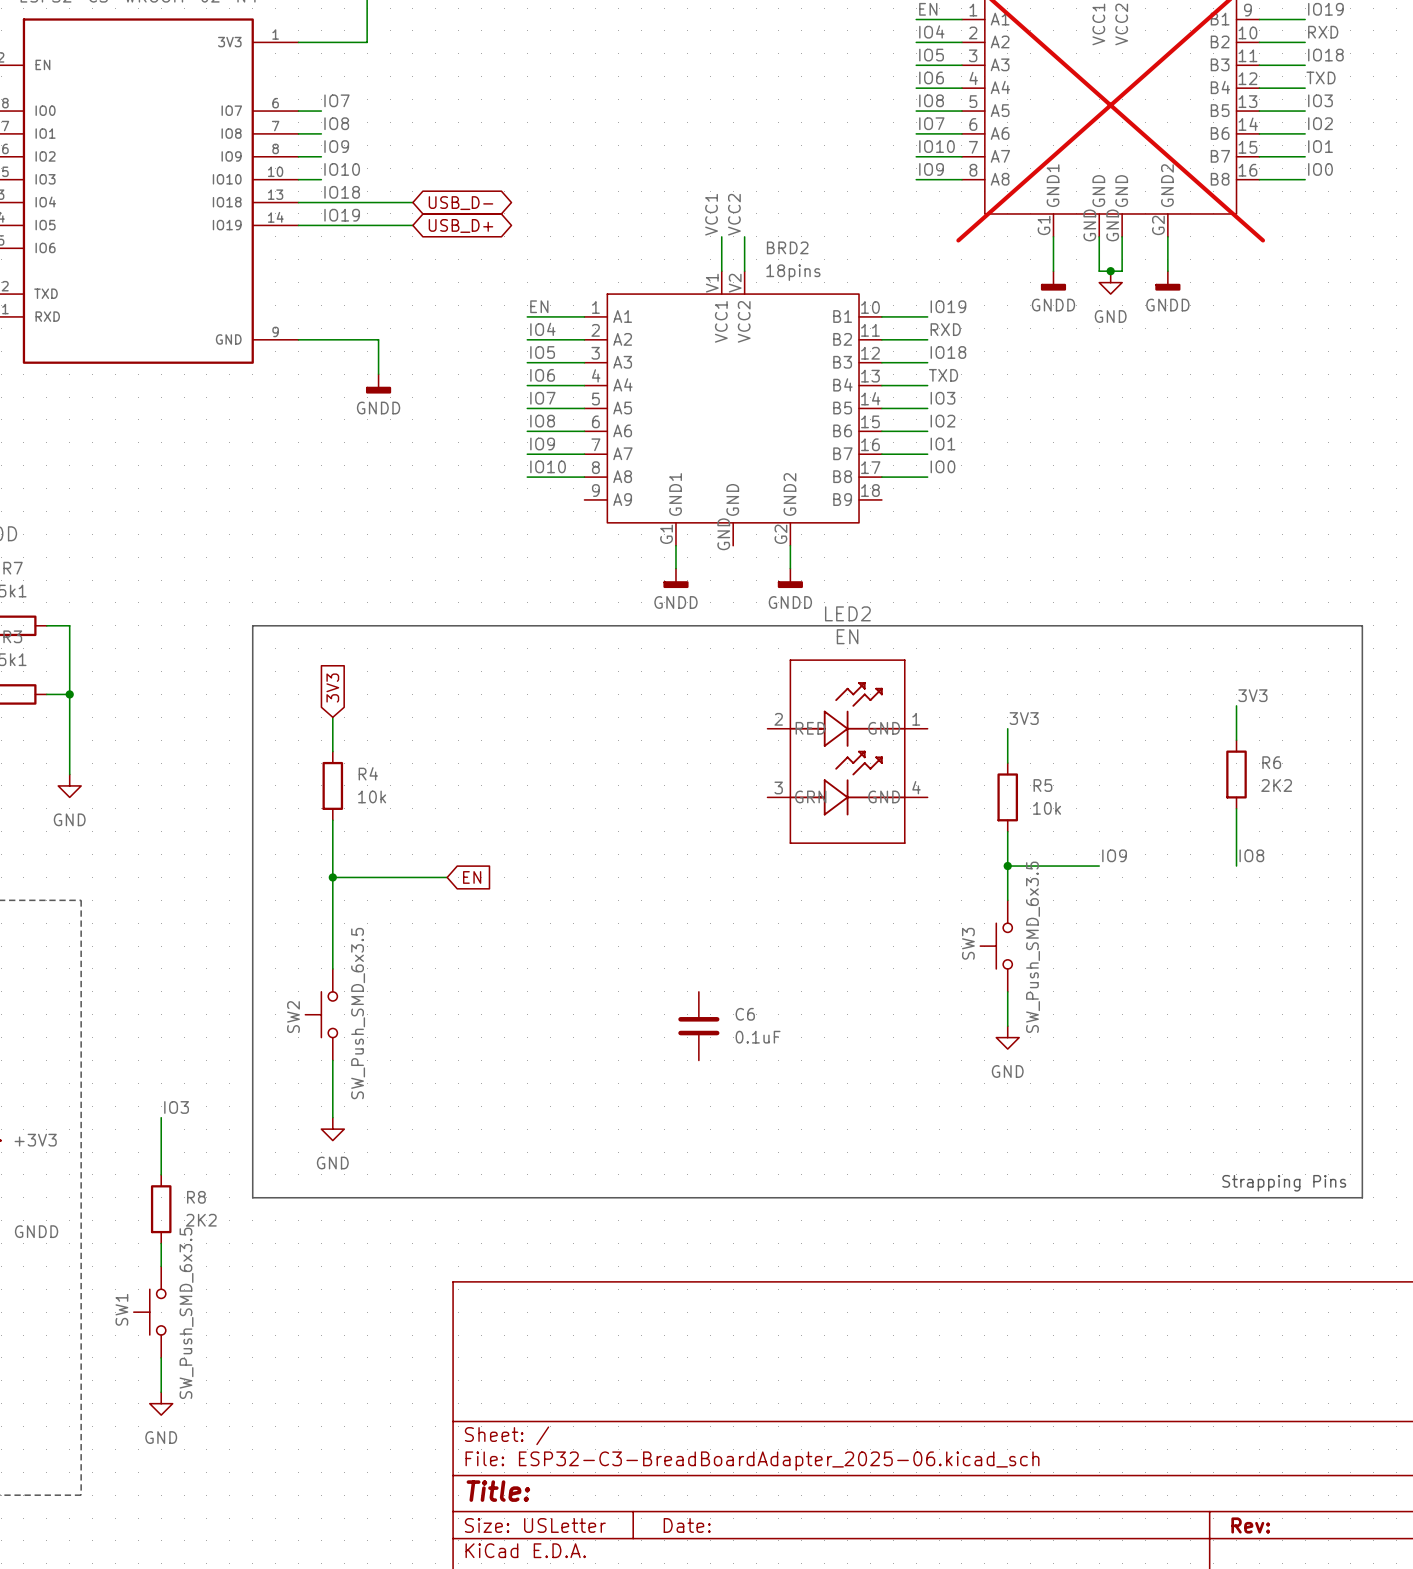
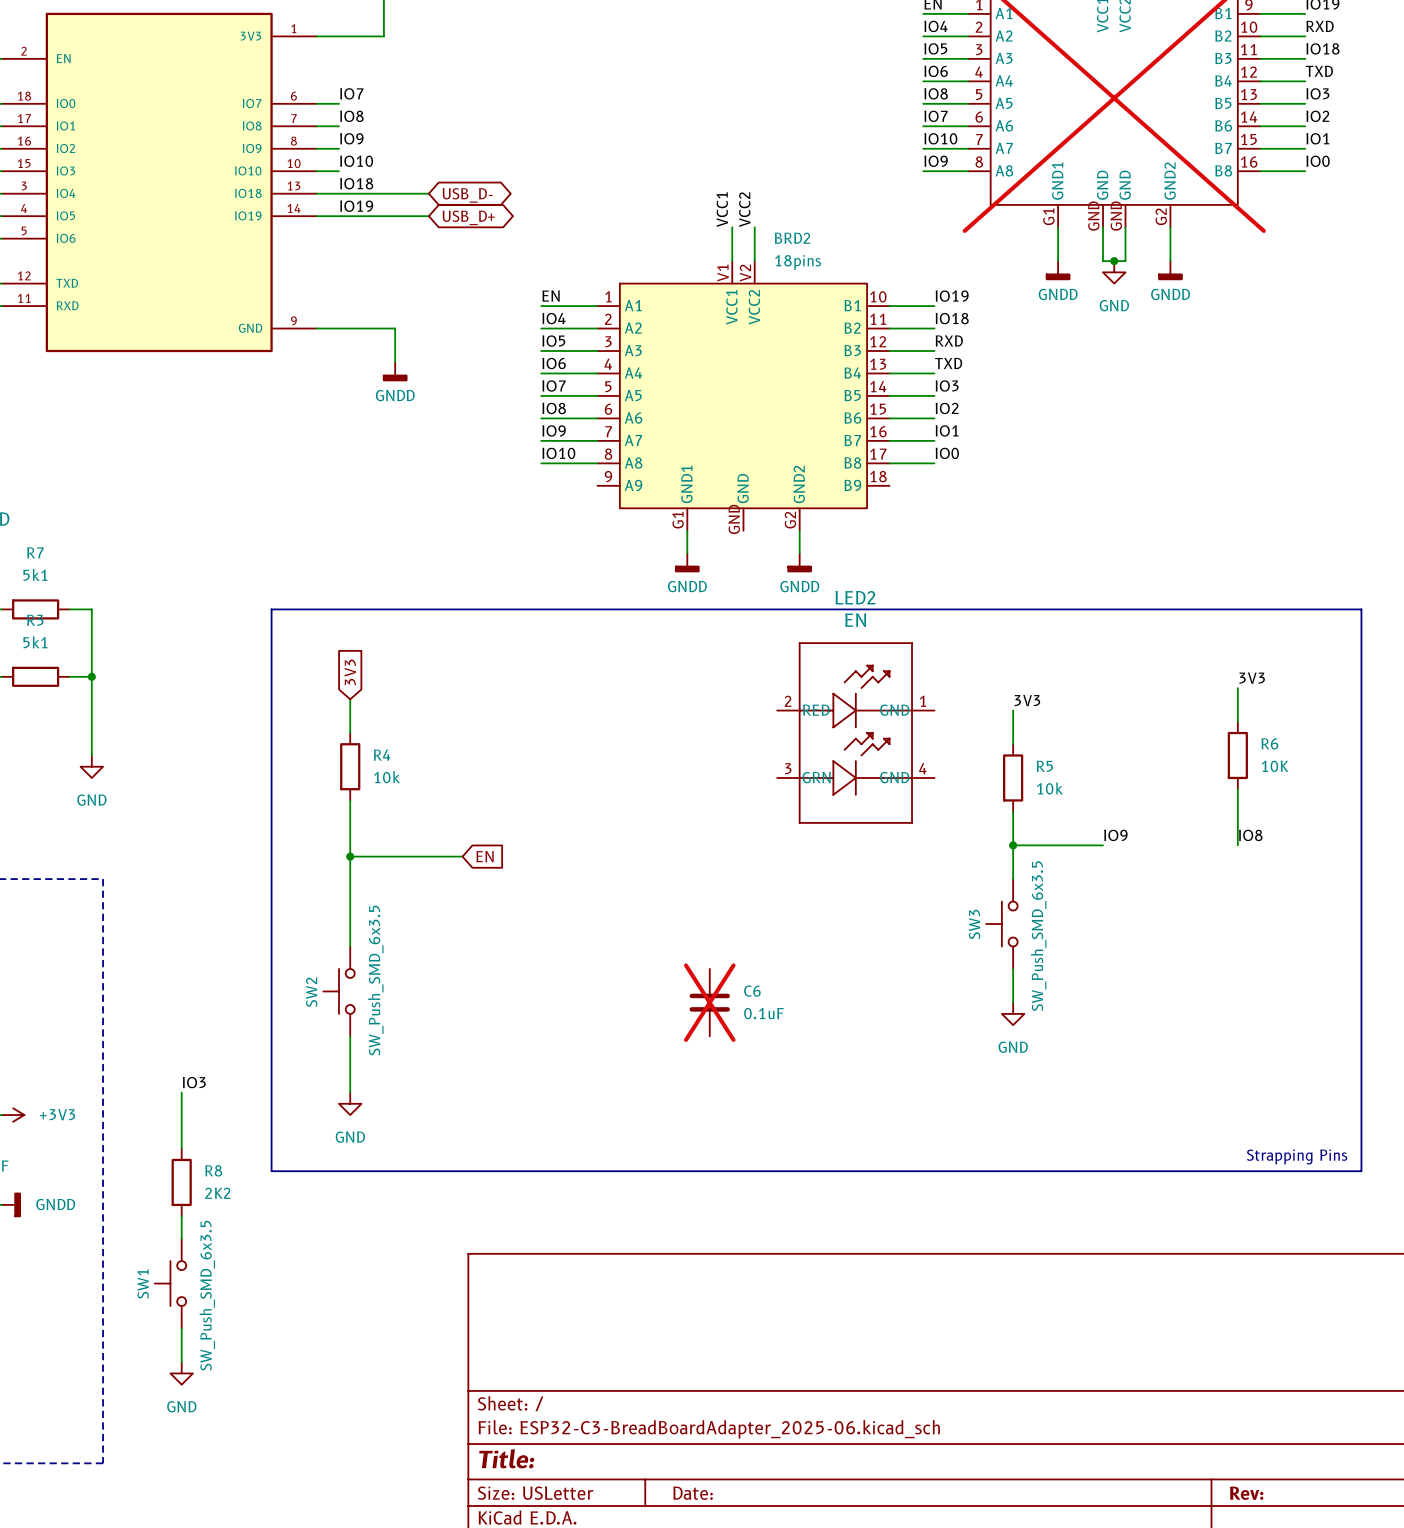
label: RXD (945, 329) -> IO18 (952, 318)
label: IO18 (948, 352) -> RXD (949, 340)
R6 value: 2K2 (1276, 785) -> 10K (1275, 766)
C6 do-not-place cross: none -> (709, 1002)

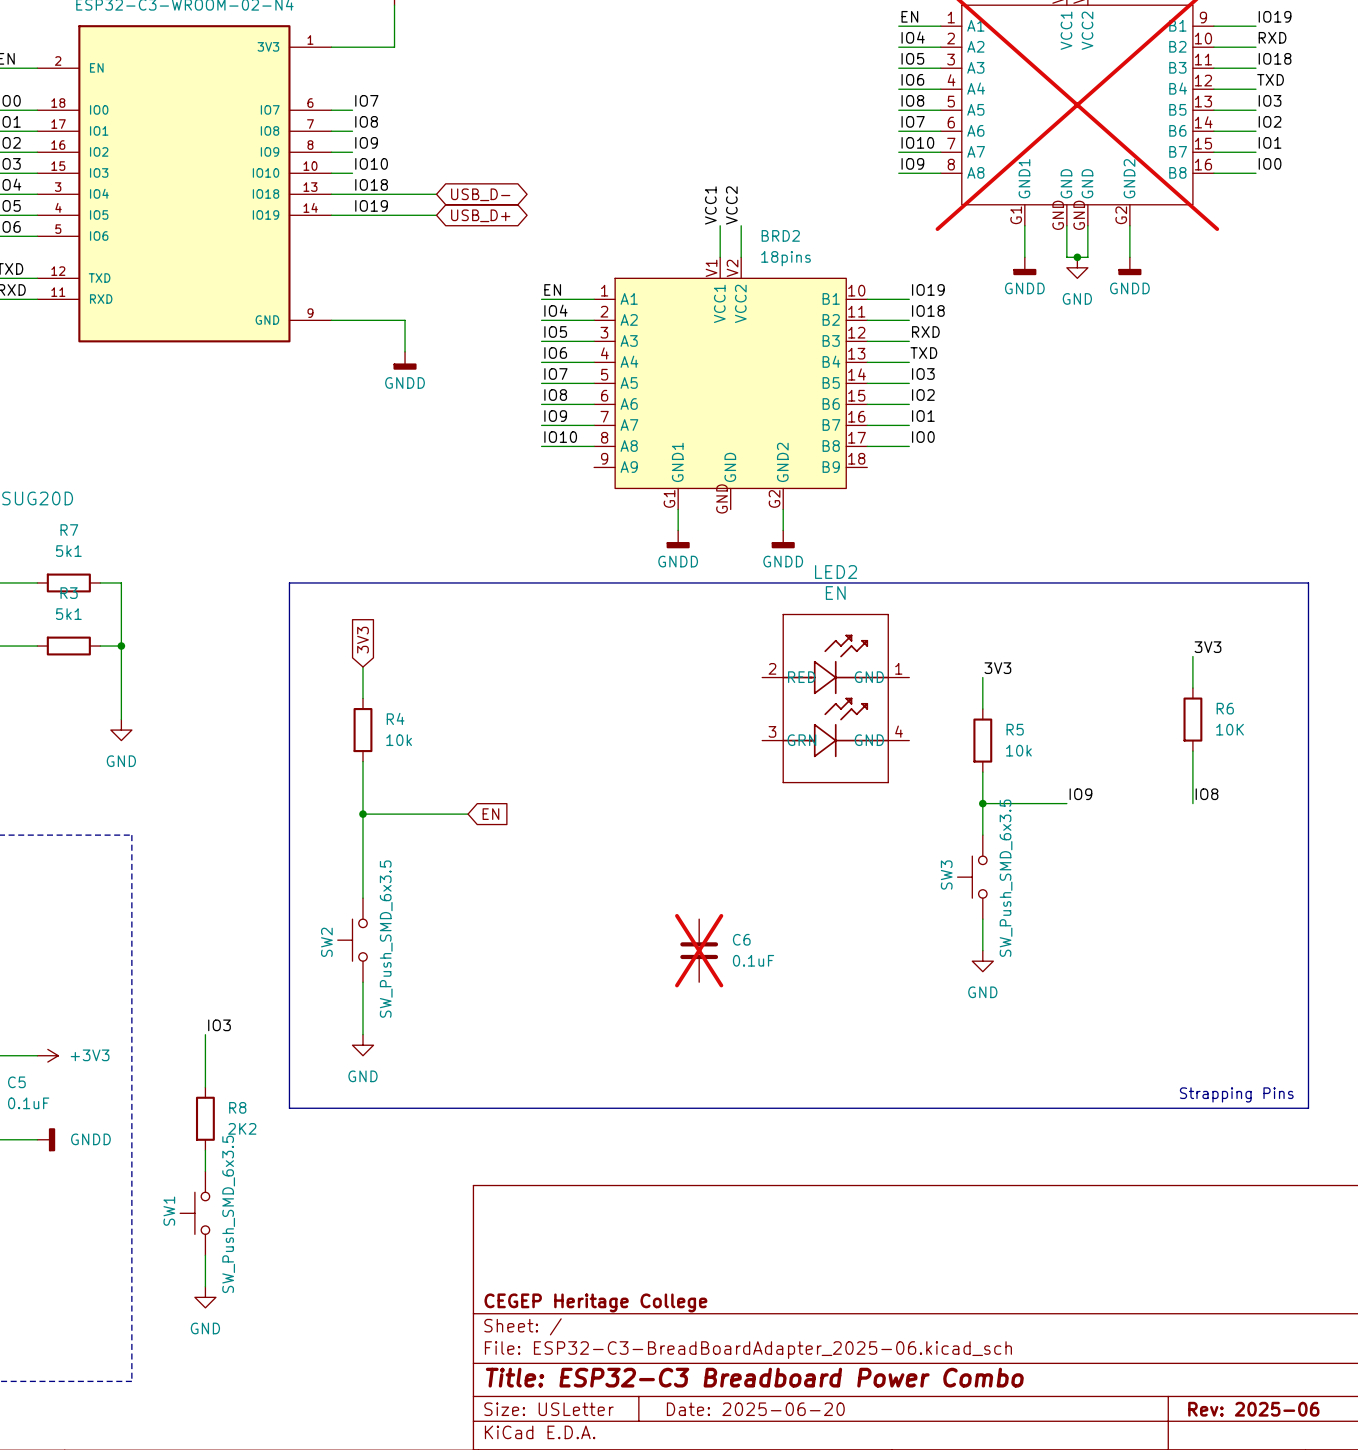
title block: none -> CEGEP Heritage College (595, 1302)
title block: Title: (506, 1458) -> Title: ESP32-C3 Breadboard Power Combo (754, 1377)
title block: Date: (693, 1493) -> Date: 2025-06-20 (755, 1409)
title block: Rev: (1246, 1493) -> Rev: 2025-06 (1253, 1409)

